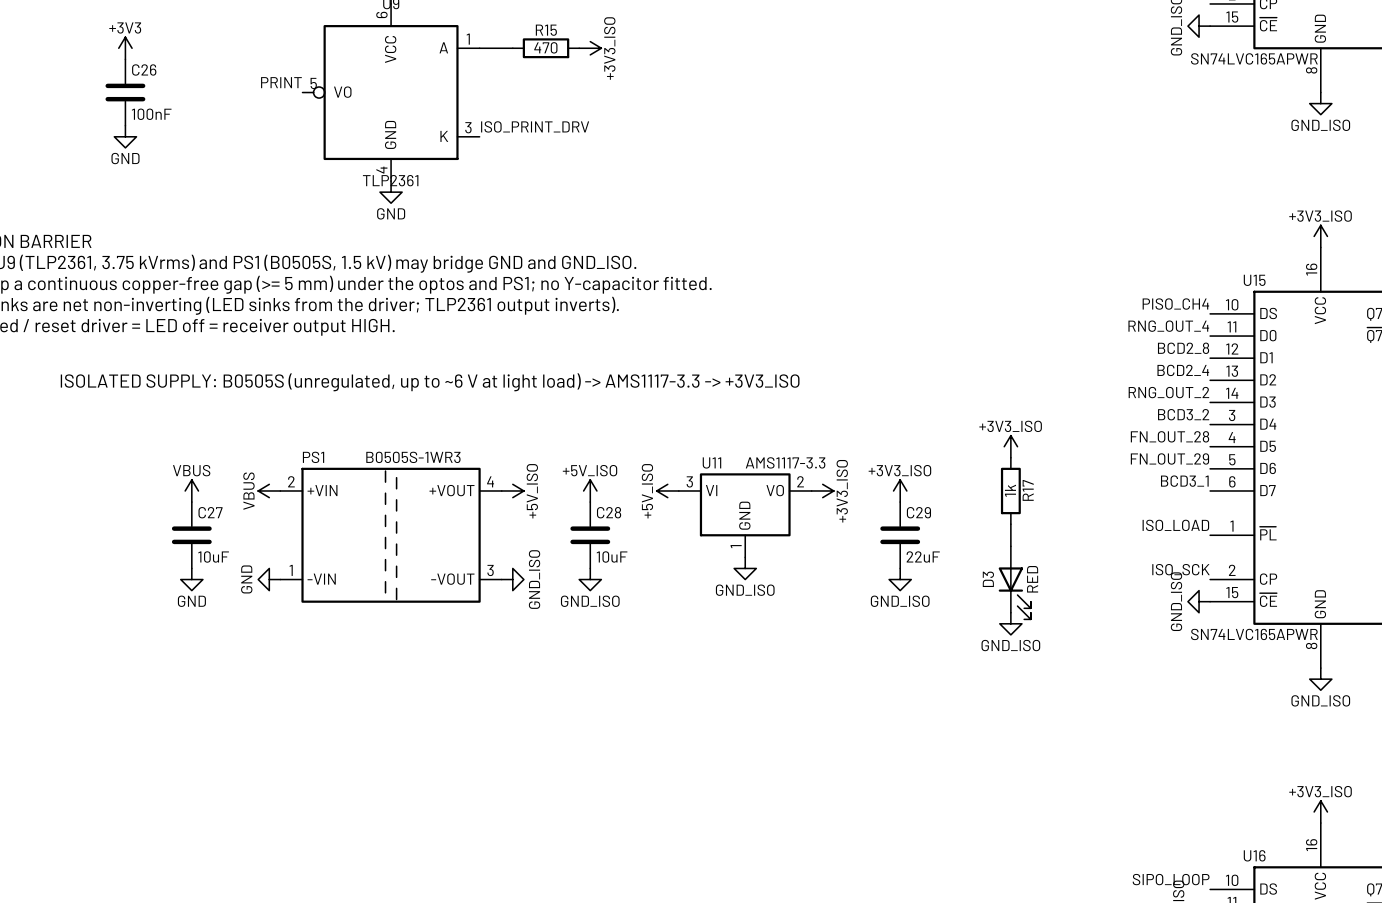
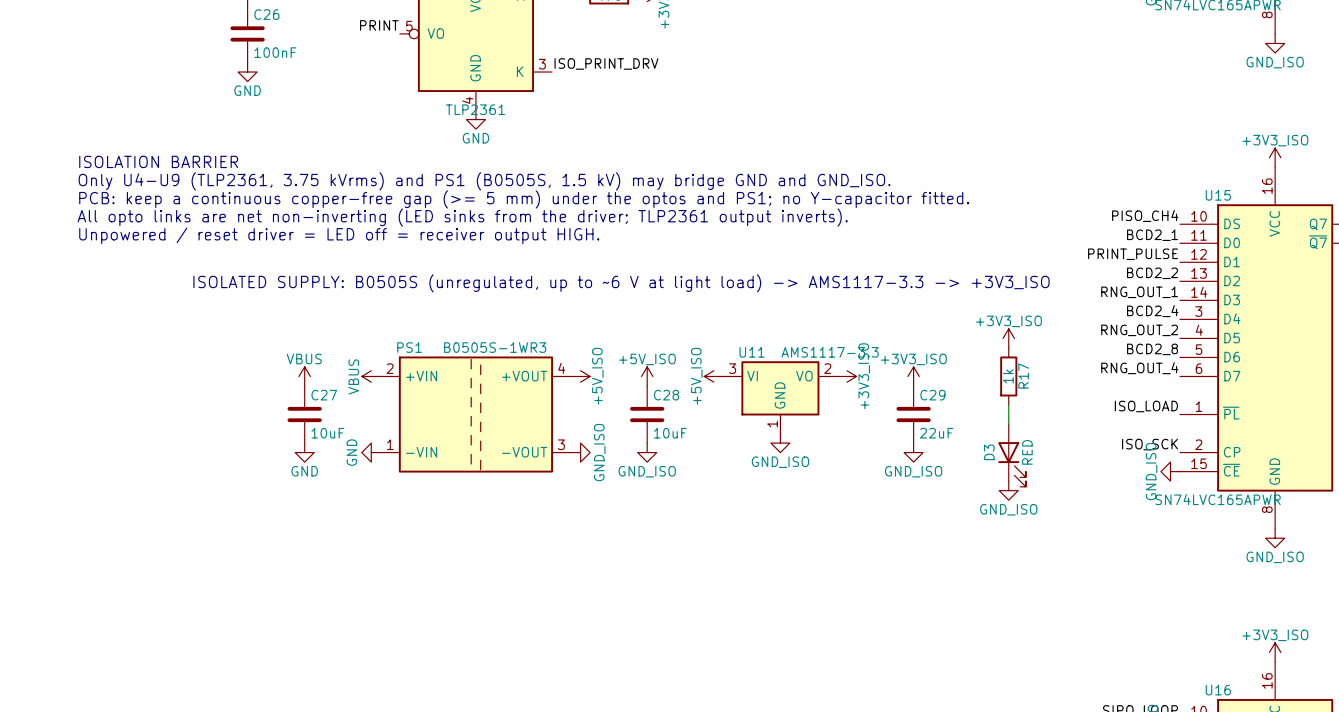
label: RNG_OUT_4 (1168, 326) -> BCD2_1 (1152, 235)
label: BCD2_8 (1183, 348) -> PRINT_PULSE (1133, 254)
label: BCD2_4 (1183, 370) -> BCD2_2 (1152, 273)
label: RNG_OUT_2 (1168, 392) -> RNG_OUT_1 (1139, 292)
label: BCD3_2 (1183, 414) -> BCD2_4 (1152, 311)
label: FN_OUT_28 (1169, 436) -> RNG_OUT_2 (1139, 330)
label: FN_OUT_29 (1169, 458) -> BCD2_8 (1152, 349)
label: BCD3_1 (1184, 481) -> RNG_OUT_4 (1139, 368)

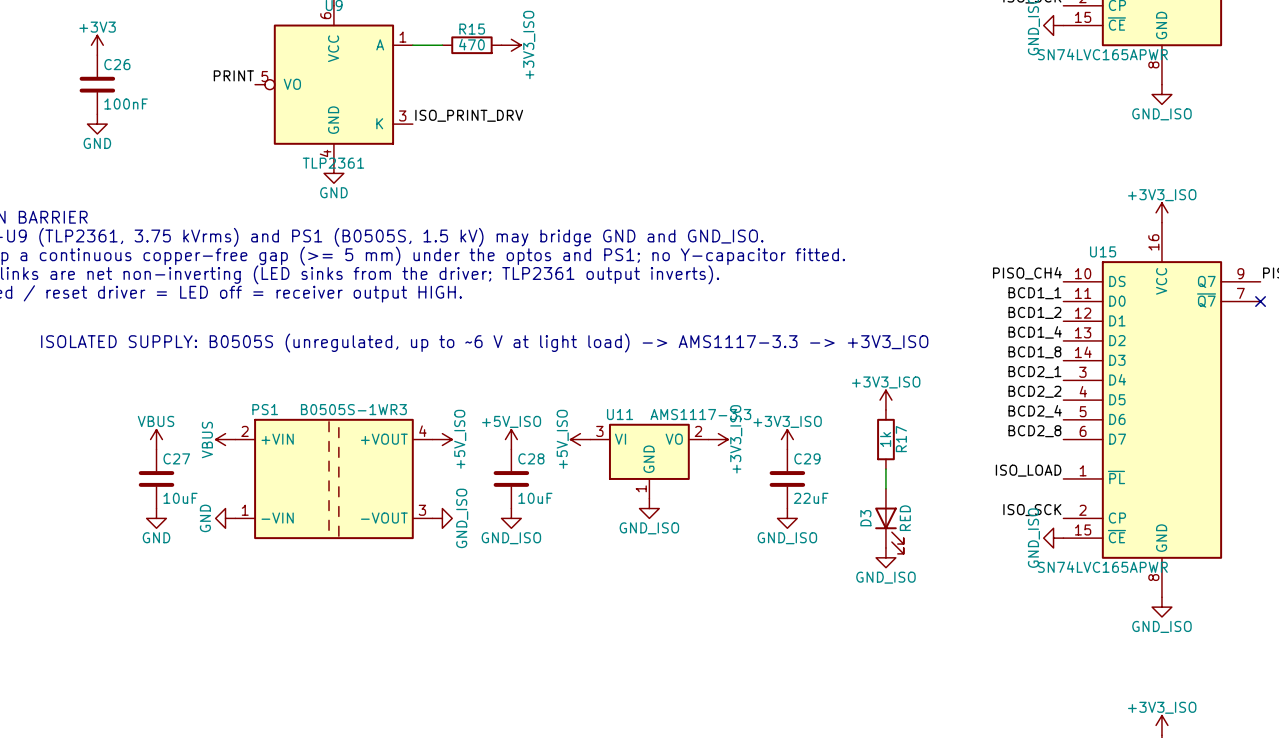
label: BCD2_1 (1152, 235) -> BCD1_1 (1034, 293)
label: PRINT_PULSE (1133, 254) -> BCD1_2 (1034, 312)
label: BCD2_2 (1152, 273) -> BCD1_4 (1035, 332)
label: RNG_OUT_1 (1139, 292) -> BCD1_8 (1034, 352)
label: BCD2_4 (1152, 311) -> BCD2_1 (1034, 372)
label: RNG_OUT_2 (1139, 330) -> BCD2_2 (1034, 391)
label: BCD2_8 (1152, 349) -> BCD2_4 (1035, 411)
label: RNG_OUT_4 (1139, 368) -> BCD2_8 (1034, 431)

